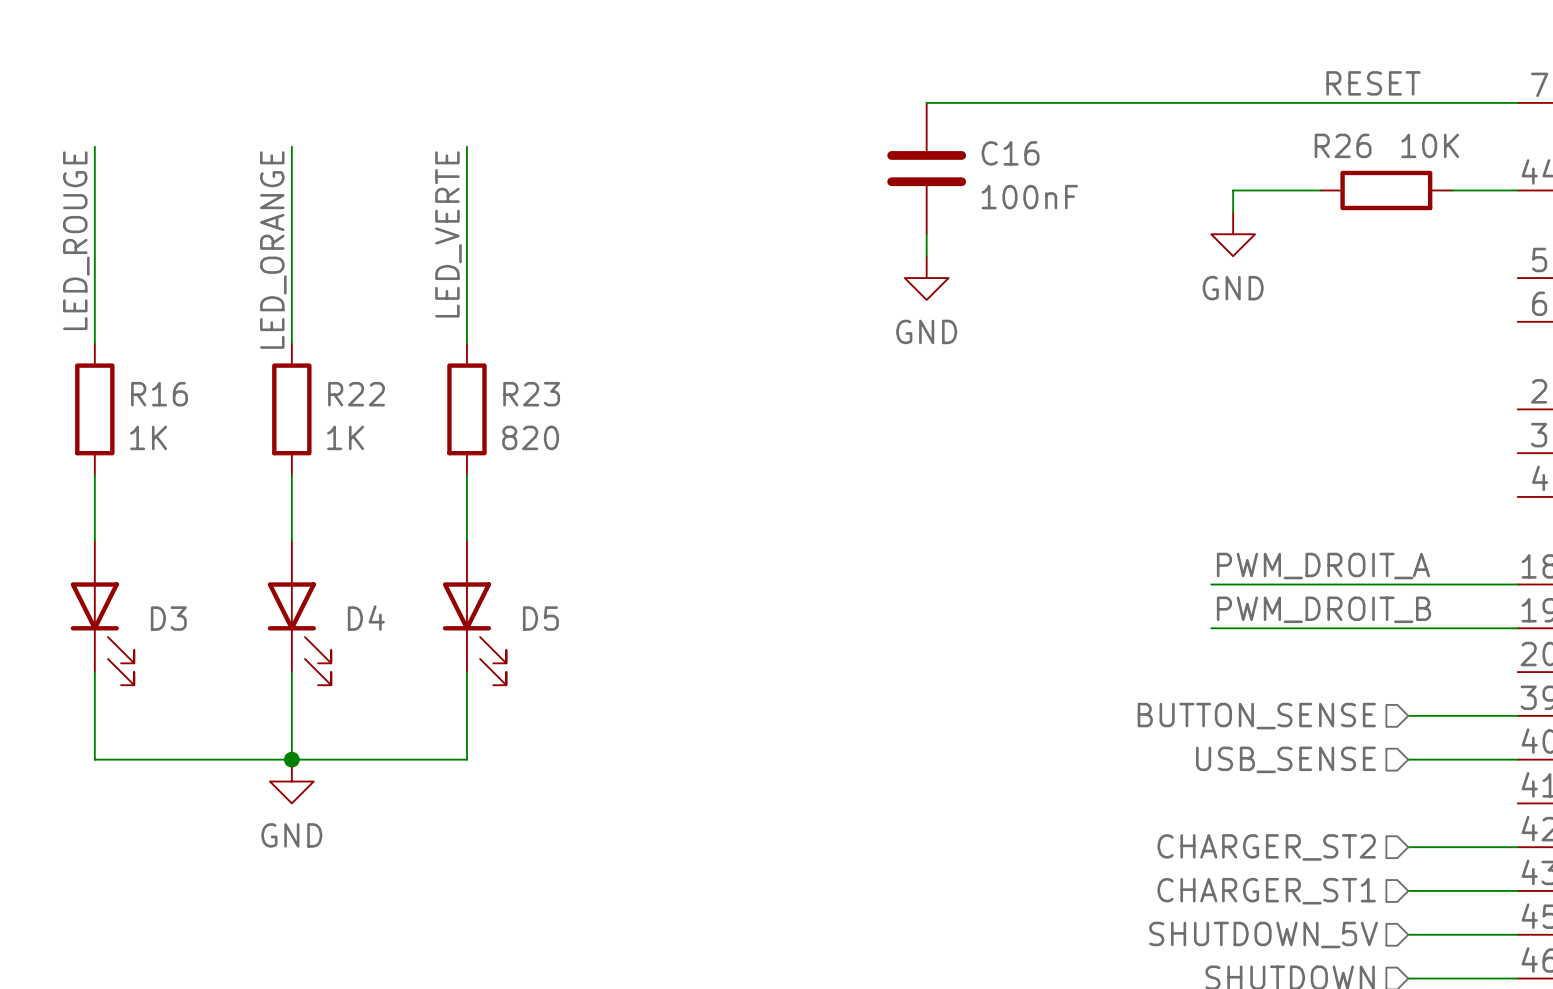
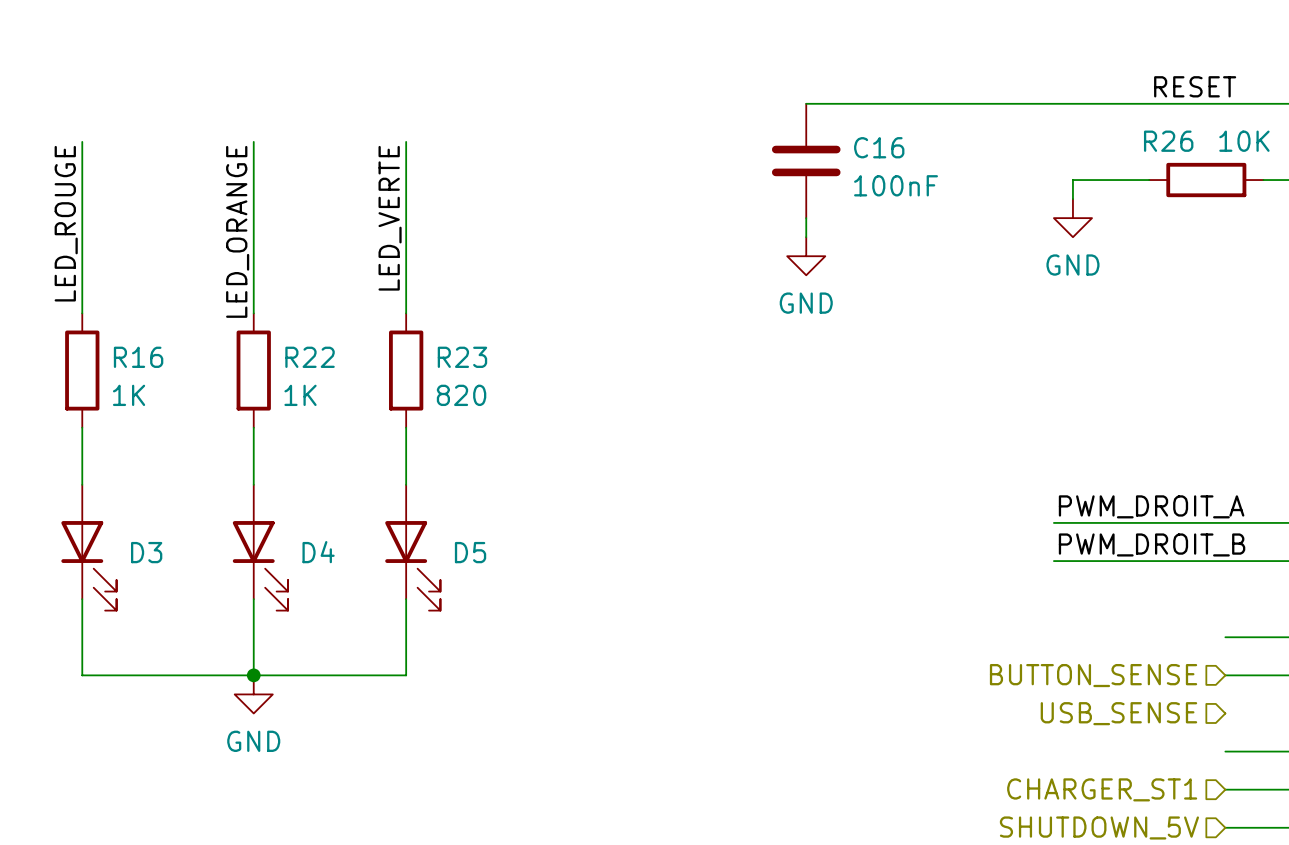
hierarchical label: BUTTON_SENSE (1256, 716) -> none
hierarchical label: USB_SENSE (1285, 759) -> BUTTON_SENSE (1093, 675)
hierarchical label: none -> USB_SENSE (1118, 713)
hierarchical label: CHARGER_ST2 (1266, 847) -> none

